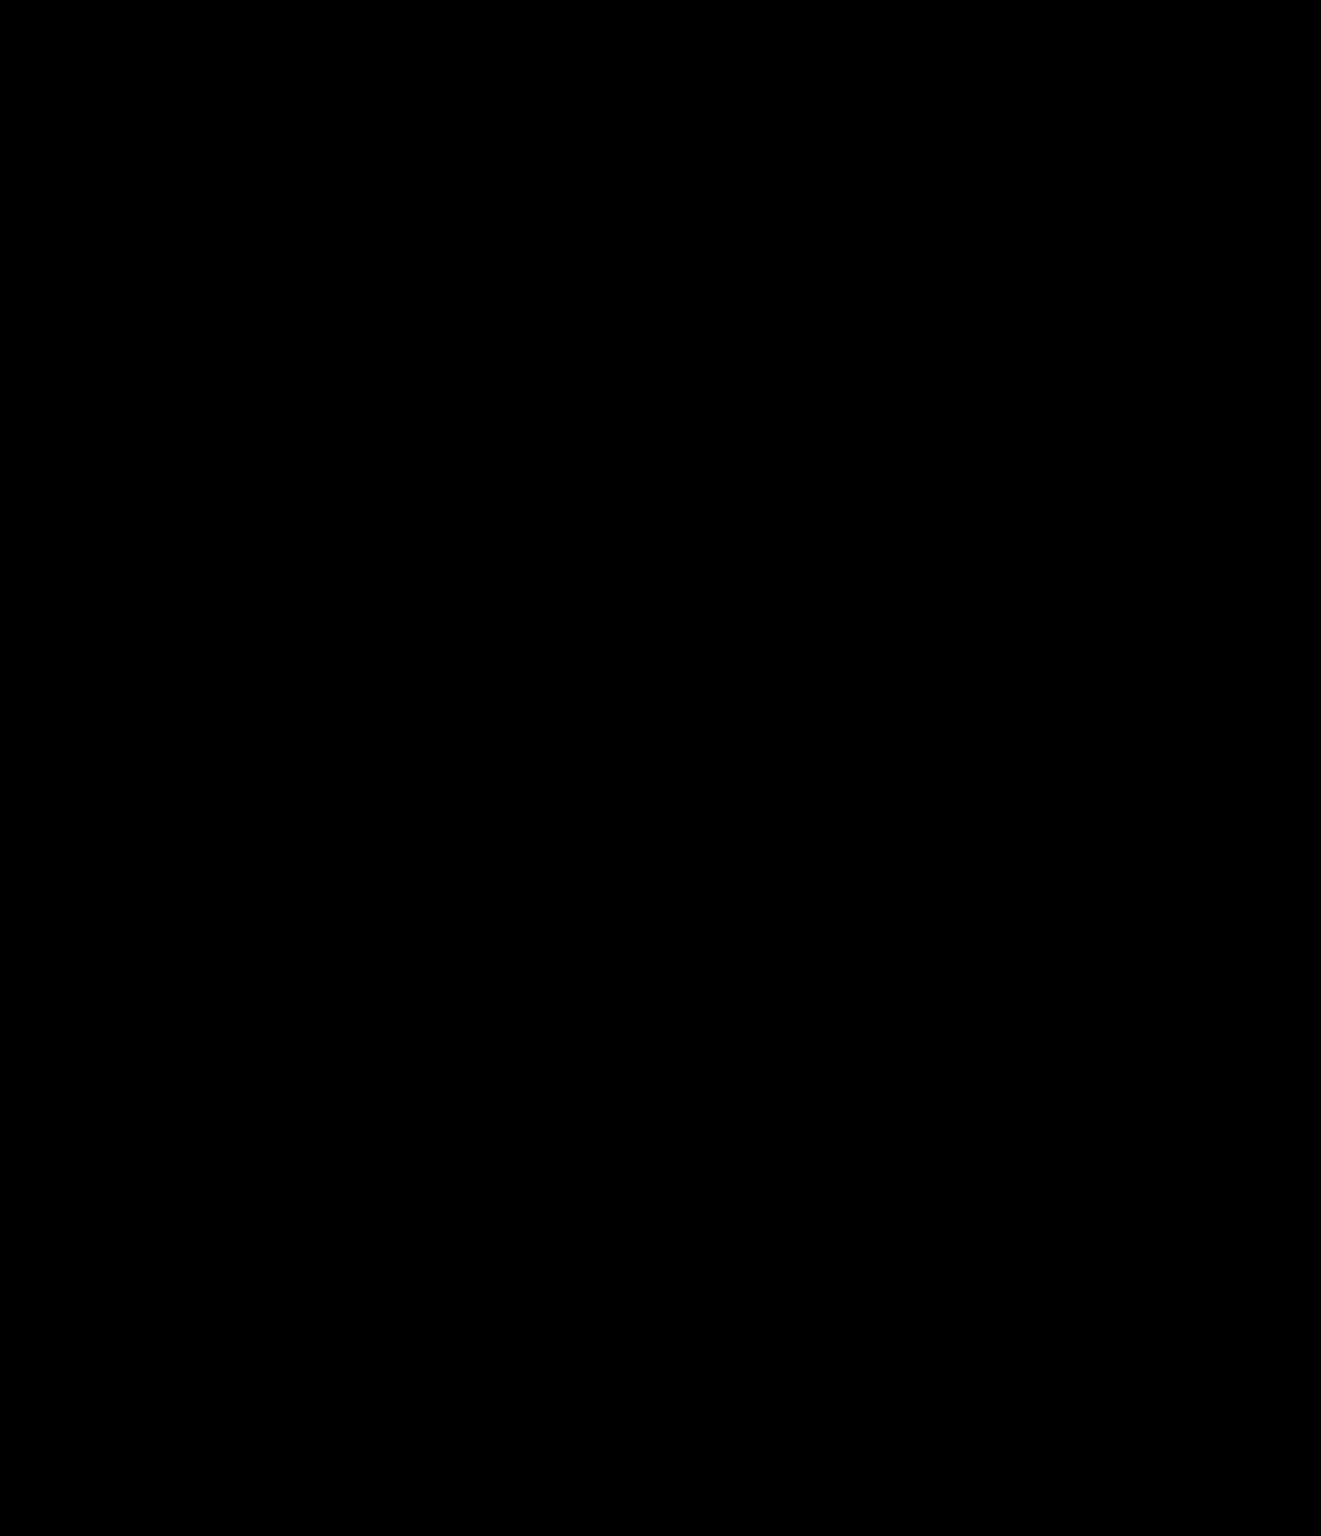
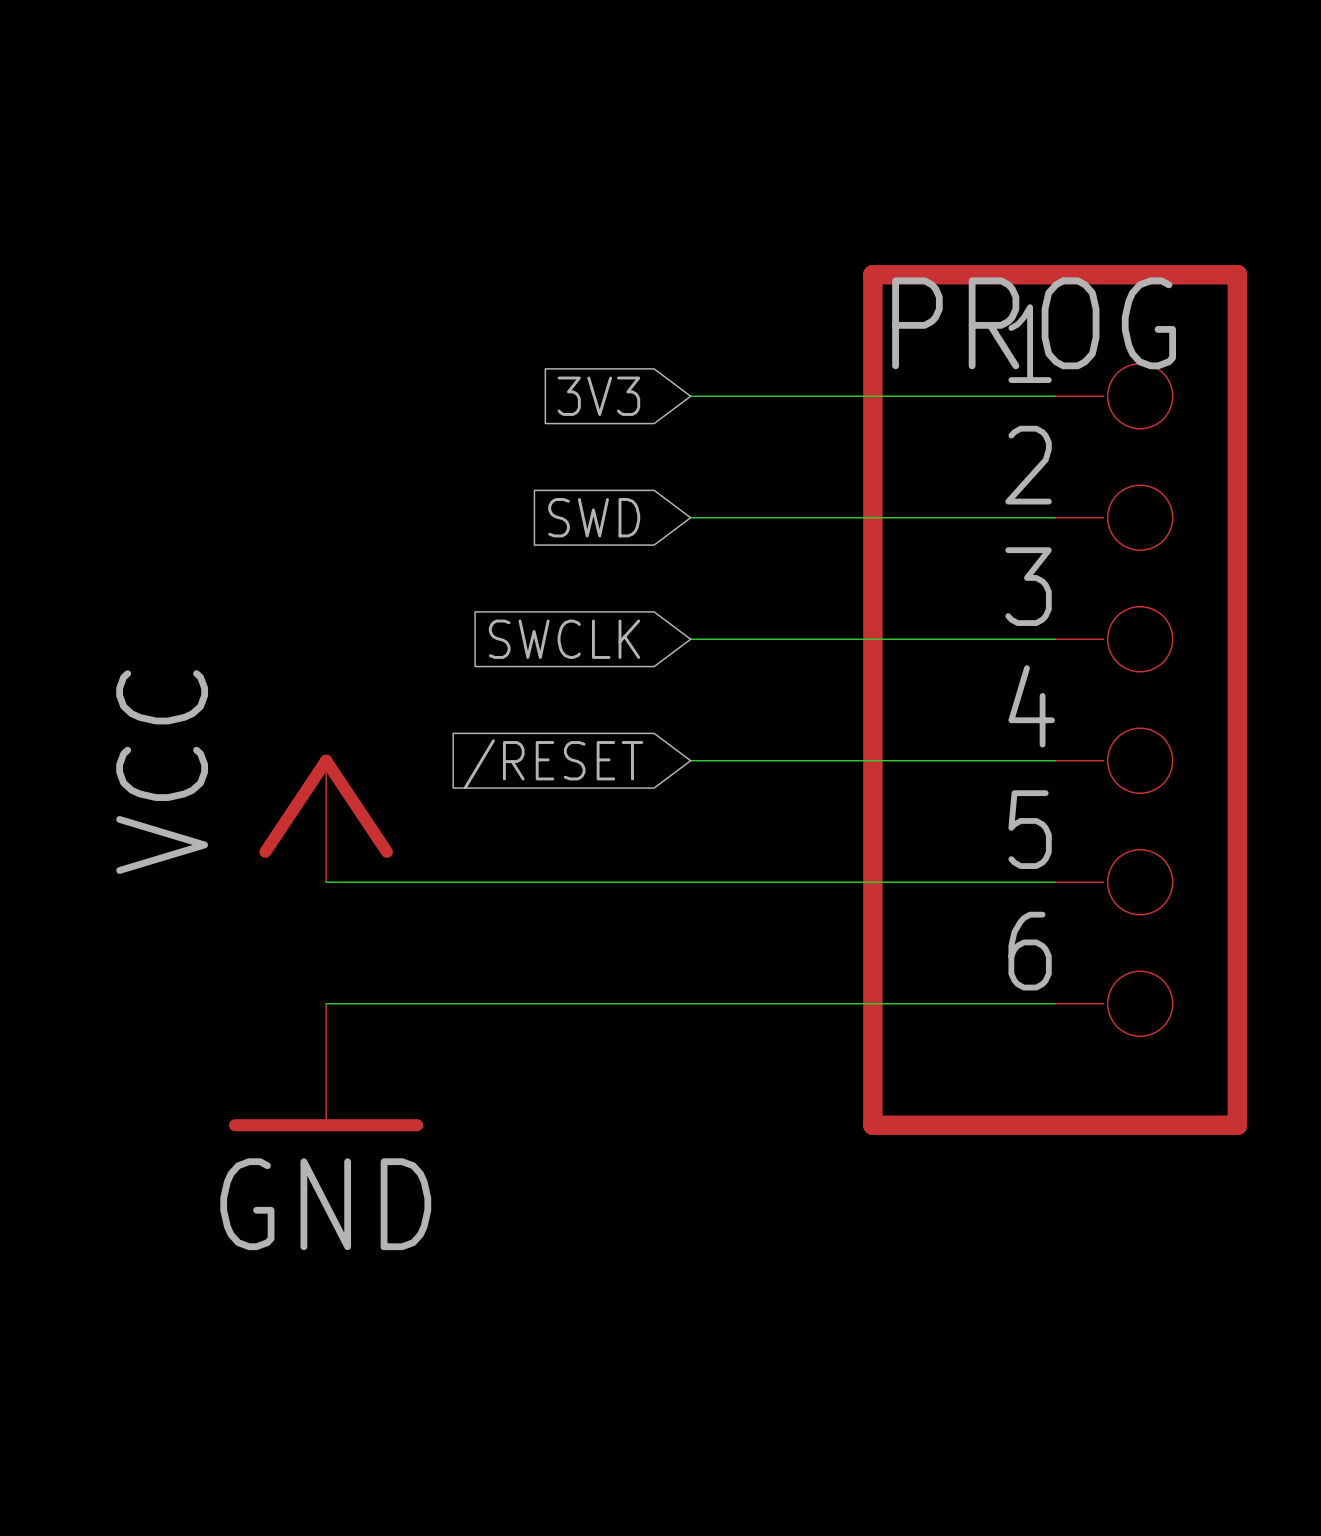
global label: none -> 3V3 (598, 396)
wire: none -> (690, 396) (1055, 396)
global label: none -> SWD (594, 517)
wire: none -> (690, 517) (1055, 517)
global label: none -> SWCLK (564, 639)
wire: none -> (690, 639) (1055, 639)
PROG: none -> (1055, 699)
wire: none -> (690, 760) (1055, 760)
global label: none -> /RESET (553, 764)
power symbol: none -> VCC (326, 818)
wire: none -> (326, 882) (1055, 882)
wire: none -> (326, 1003) (1055, 1003)
power symbol: none -> GND (326, 1067)

